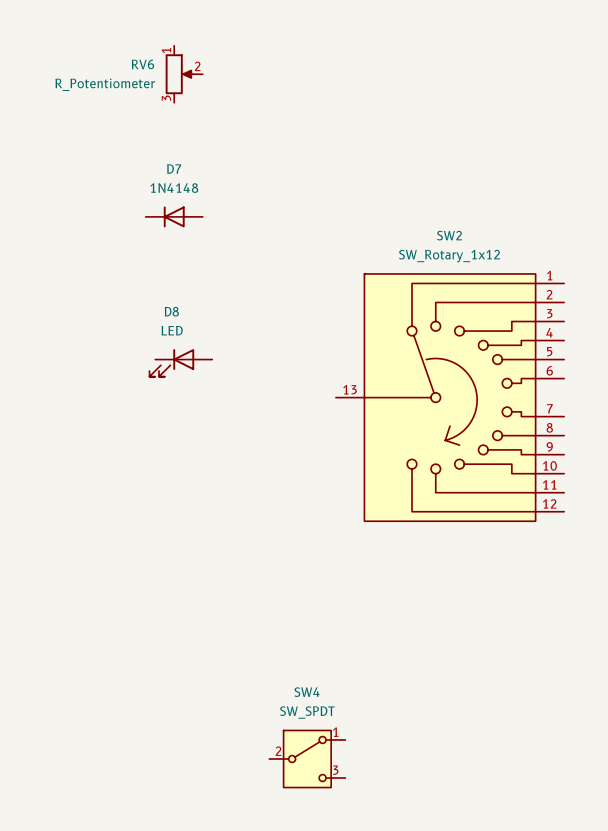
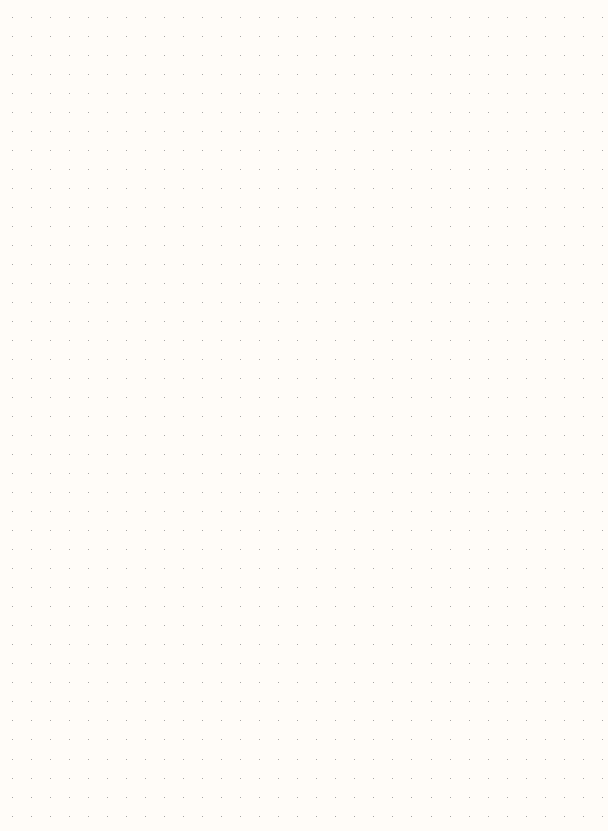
RV6: R_Potentiometer (184, 74) -> none
D7: 1N4148 (174, 216) -> none
D8: LED (180, 362) -> none
SW2: SW_Rotary_1x12 (450, 397) -> none
SW4: SW_SPDT (307, 759) -> none

